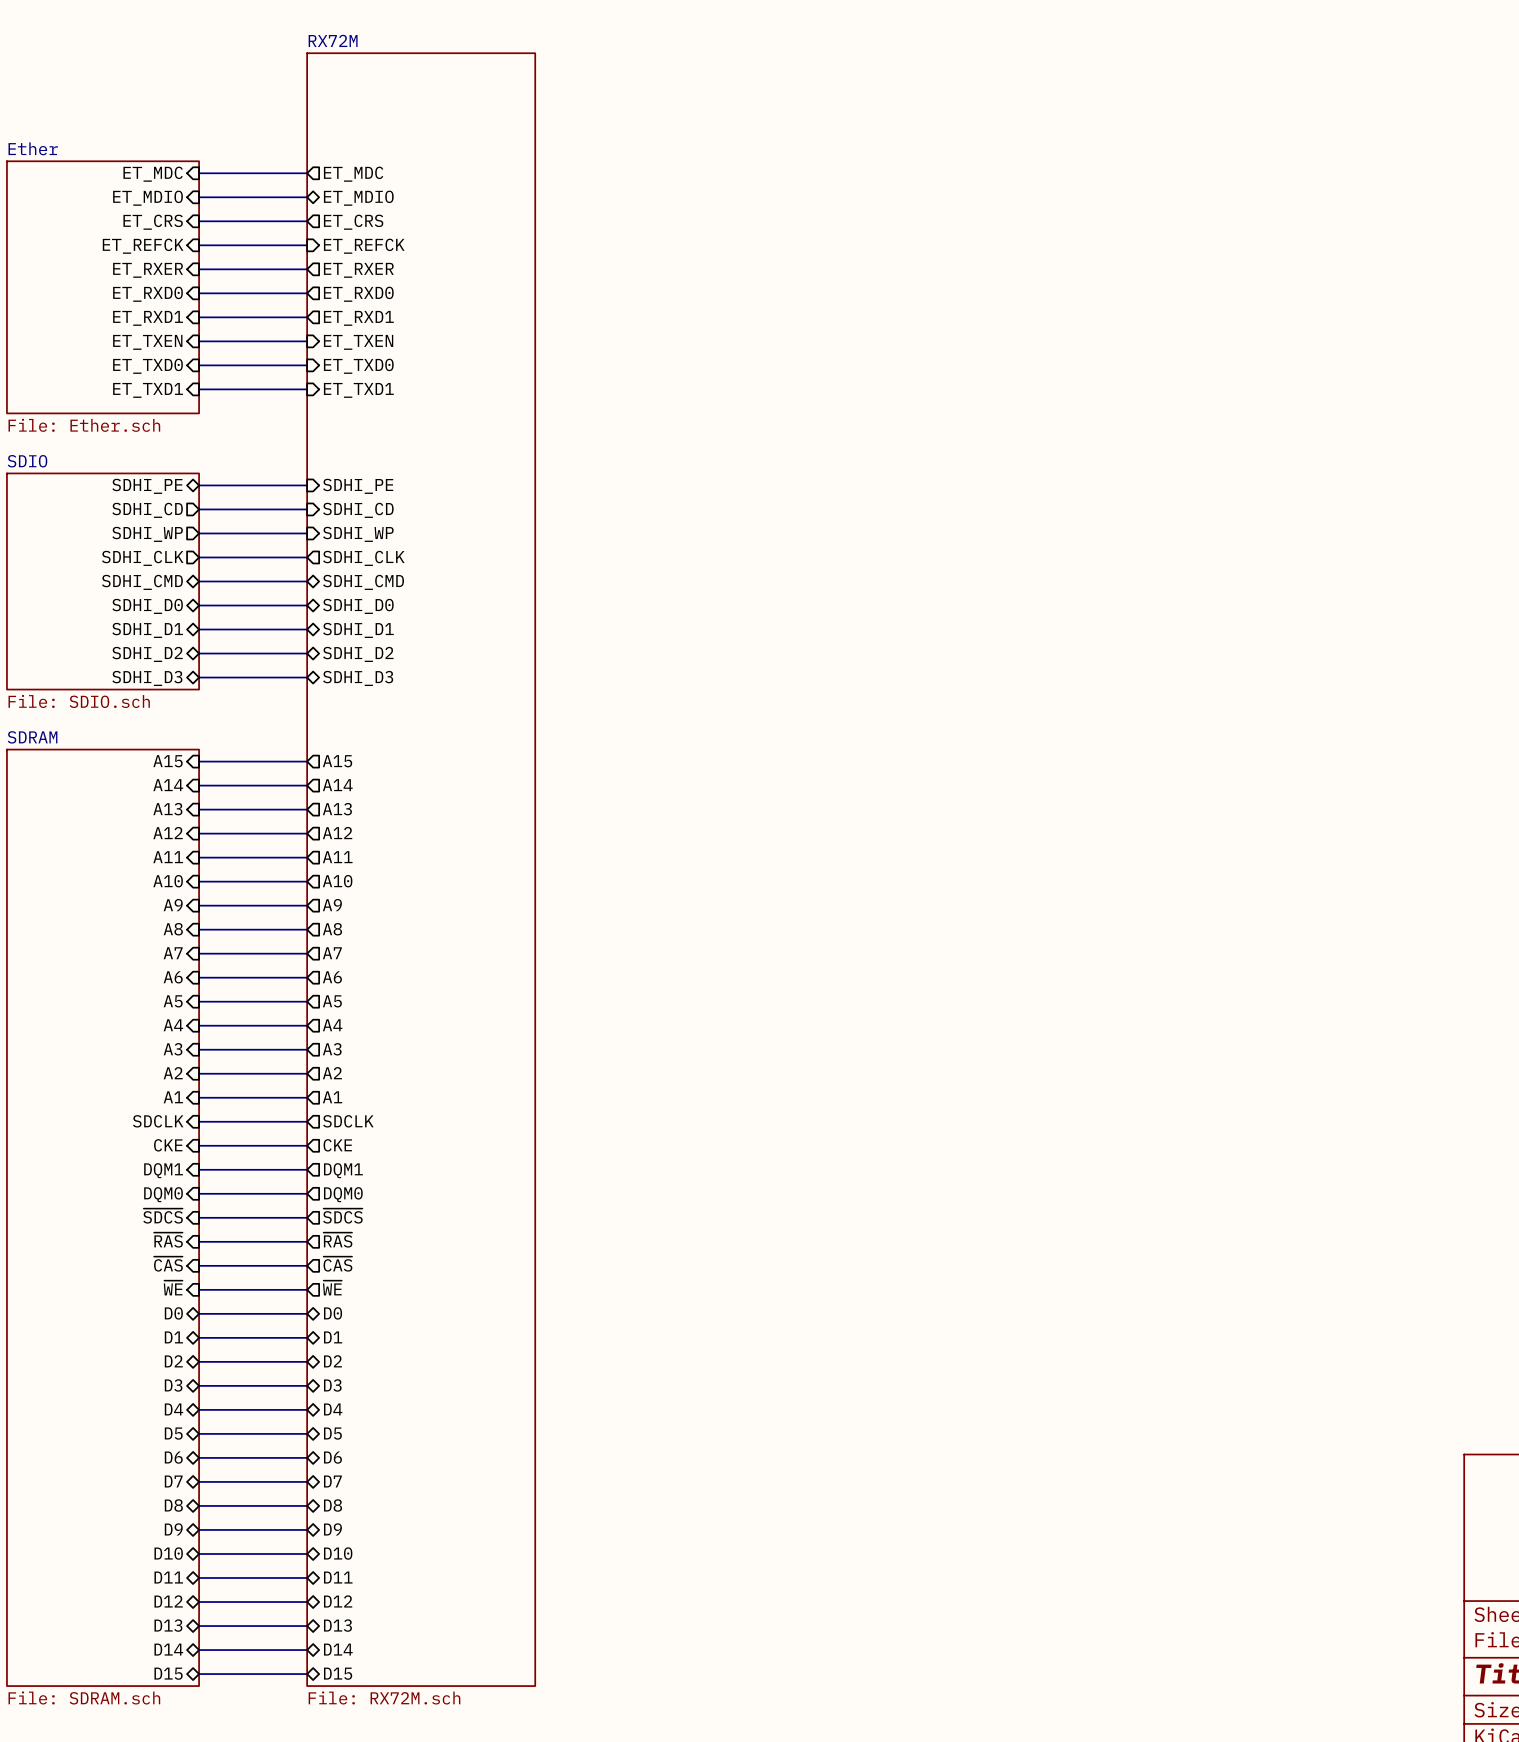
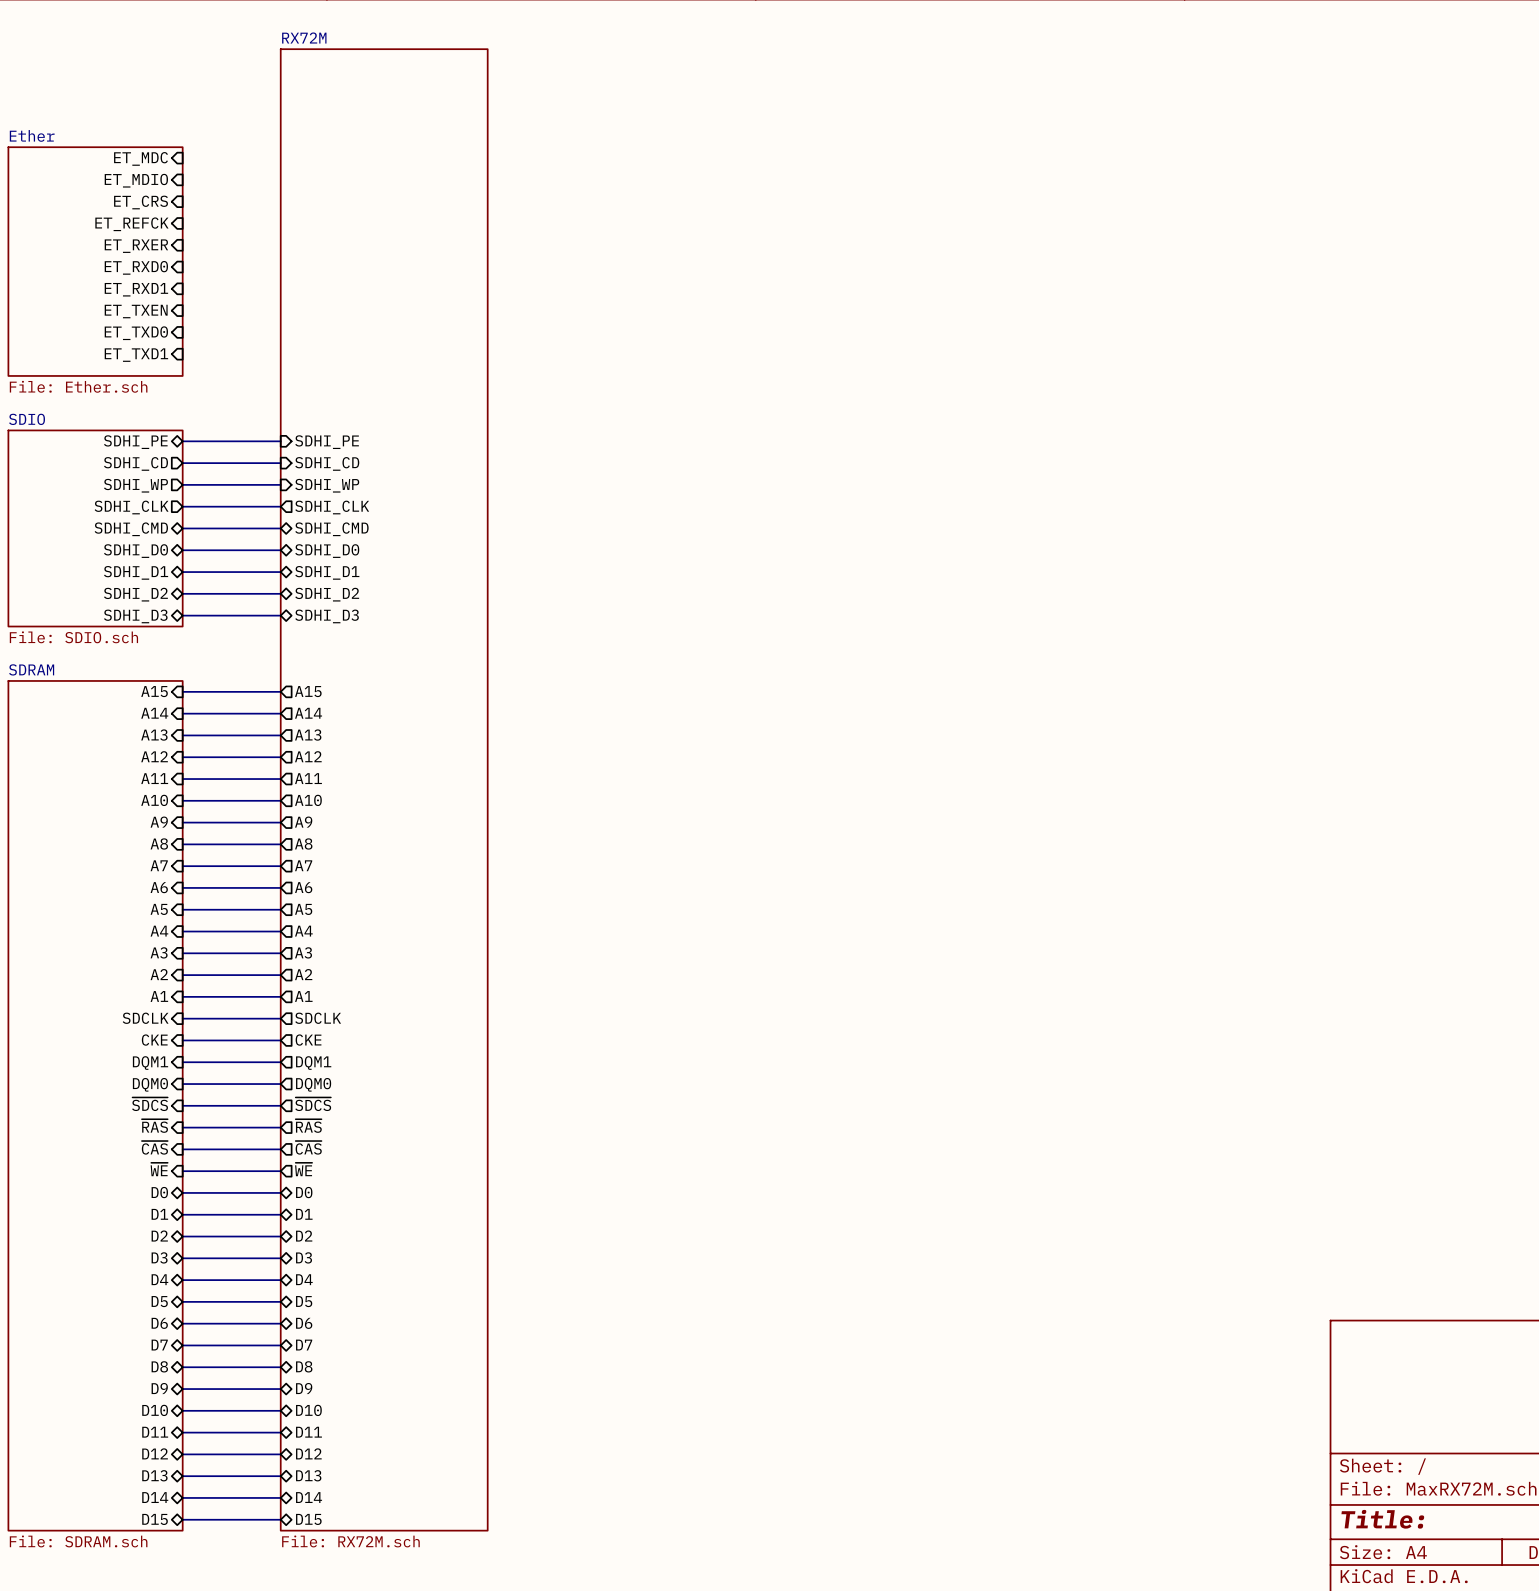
wire: (199, 173) (307, 173) -> none
sheet pin: ET_MDC (353, 174) -> none
wire: (199, 197) (307, 197) -> none
sheet pin: ET_MDIO (358, 198) -> none
wire: (199, 221) (307, 221) -> none
sheet pin: ET_CRS (353, 222) -> none
wire: (199, 245) (307, 245) -> none
sheet pin: ET_REFCK (364, 246) -> none
wire: (199, 269) (307, 269) -> none
sheet pin: ET_RXER (358, 270) -> none
wire: (199, 293) (307, 293) -> none
sheet pin: ET_RXD0 (358, 294) -> none
wire: (199, 317) (307, 317) -> none
sheet pin: ET_RXD1 (358, 318) -> none
wire: (199, 341) (307, 341) -> none
sheet pin: ET_TXEN (358, 342) -> none
wire: (199, 365) (307, 365) -> none
sheet pin: ET_TXD0 (358, 366) -> none
wire: (199, 389) (307, 389) -> none
sheet pin: ET_TXD1 (358, 390) -> none

